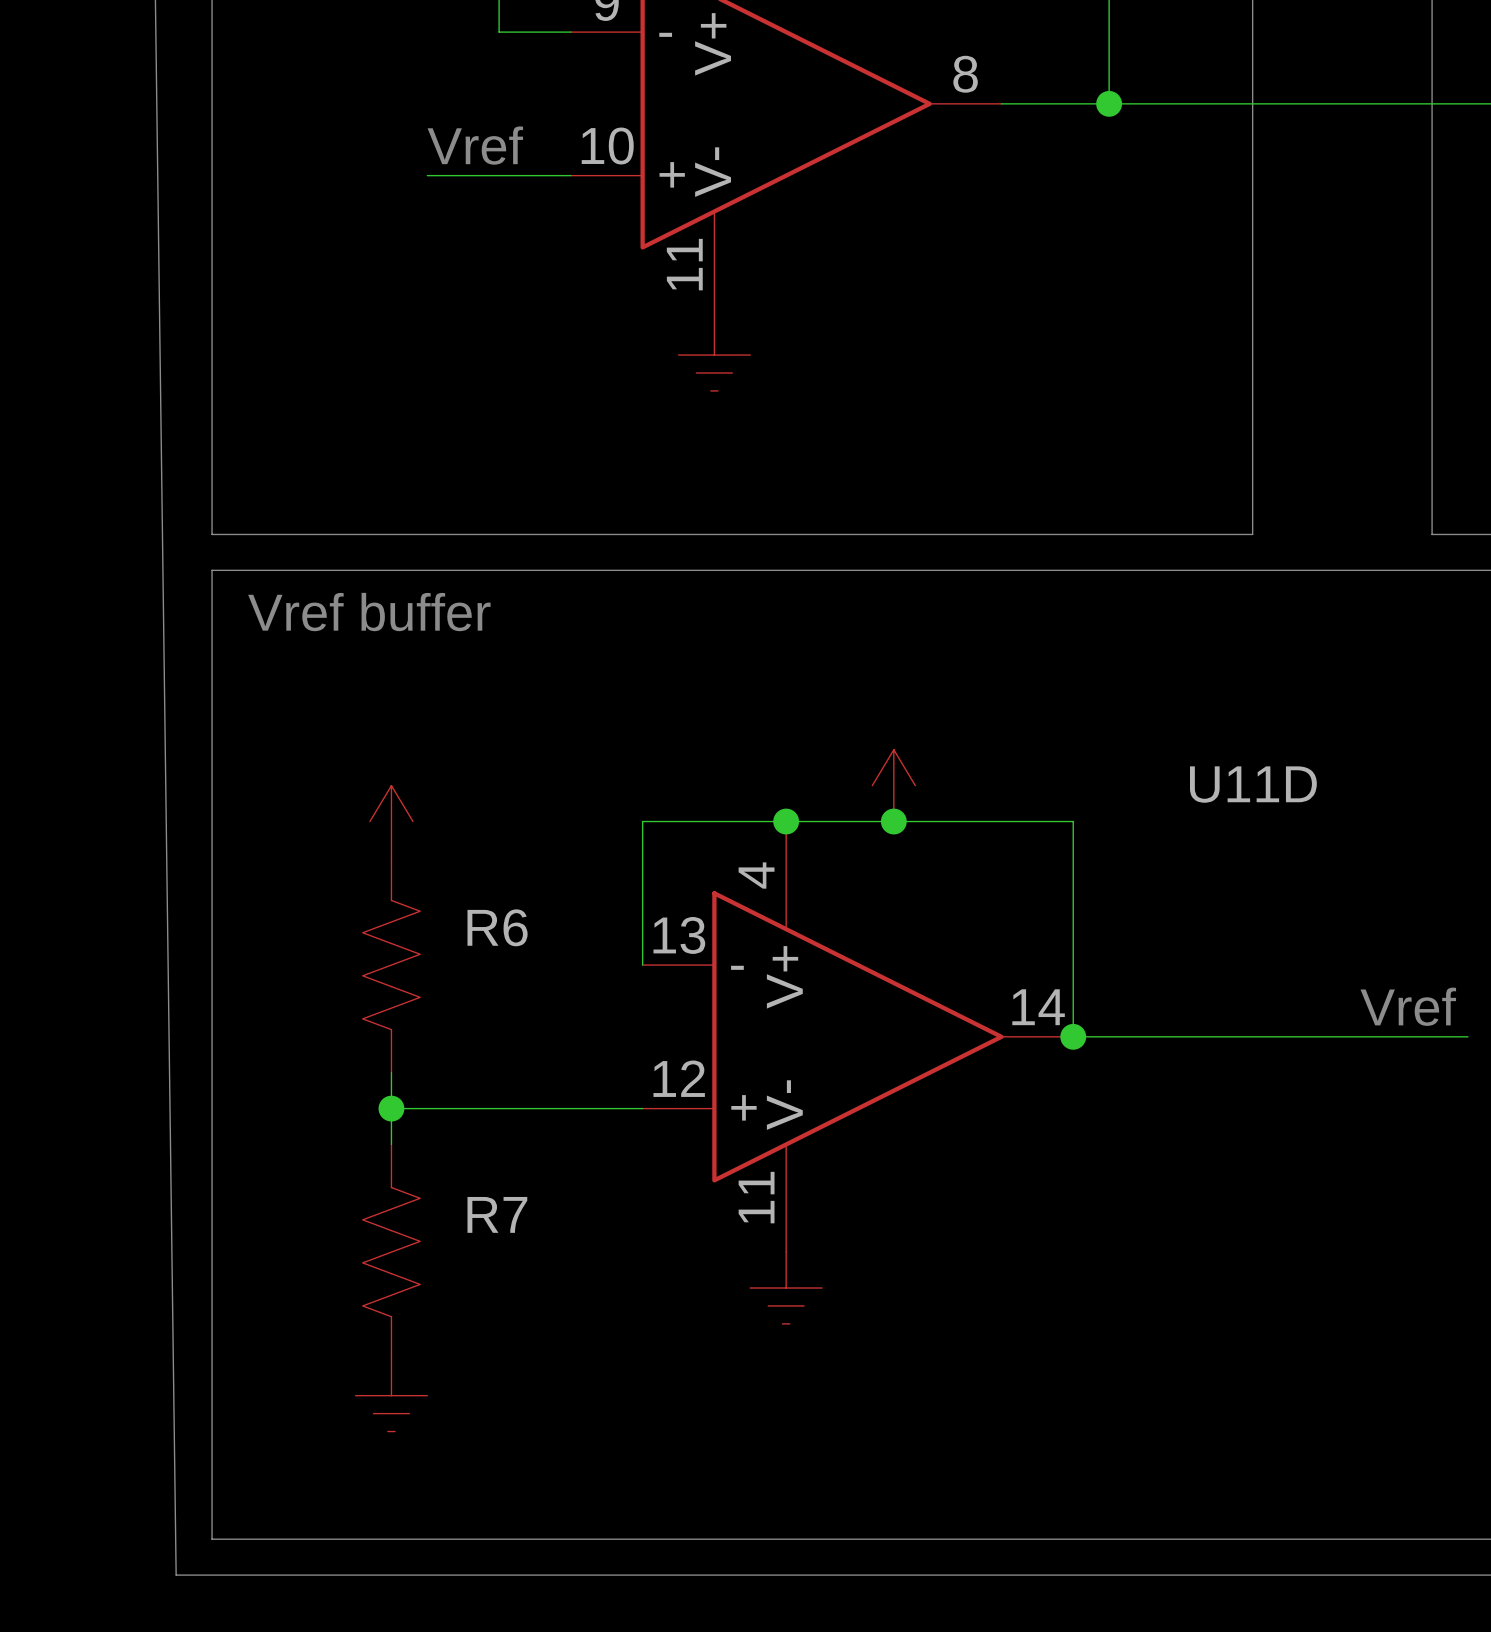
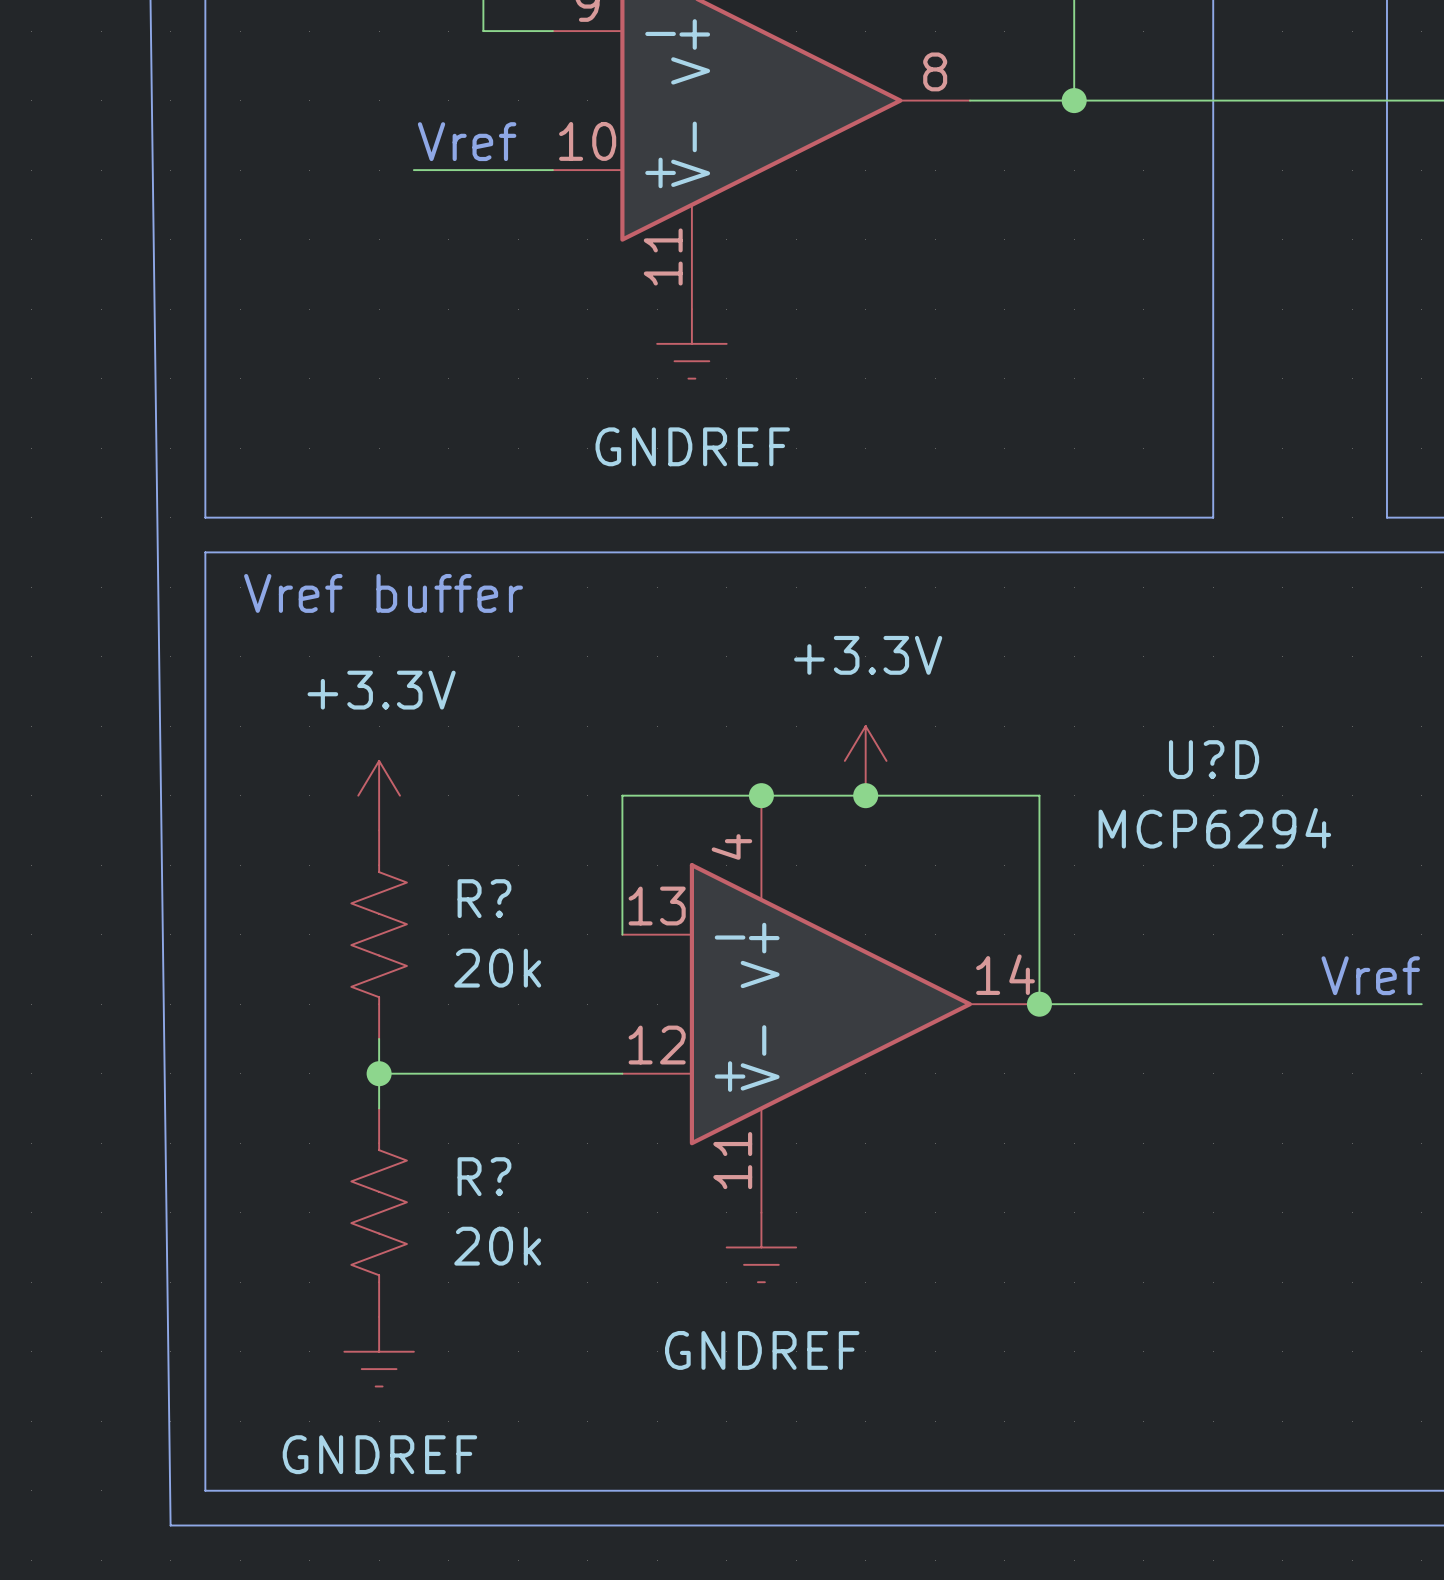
power symbol text: none -> GNDREF (692, 446)
power symbol text: none -> +3.3V (868, 655)
power symbol text: none -> +3.3V (381, 690)
U11D name: U11D (1253, 784) -> U?D (1214, 759)
U11D value: none -> MCP6294 (1214, 828)
R6 name: R6 (497, 927) -> R? (484, 898)
R6 value: none -> 20k (497, 968)
R7 name: R7 (497, 1214) -> R? (484, 1176)
R7 value: none -> 20k (497, 1246)
power symbol text: none -> GNDREF (762, 1350)
power symbol text: none -> GNDREF (379, 1454)

